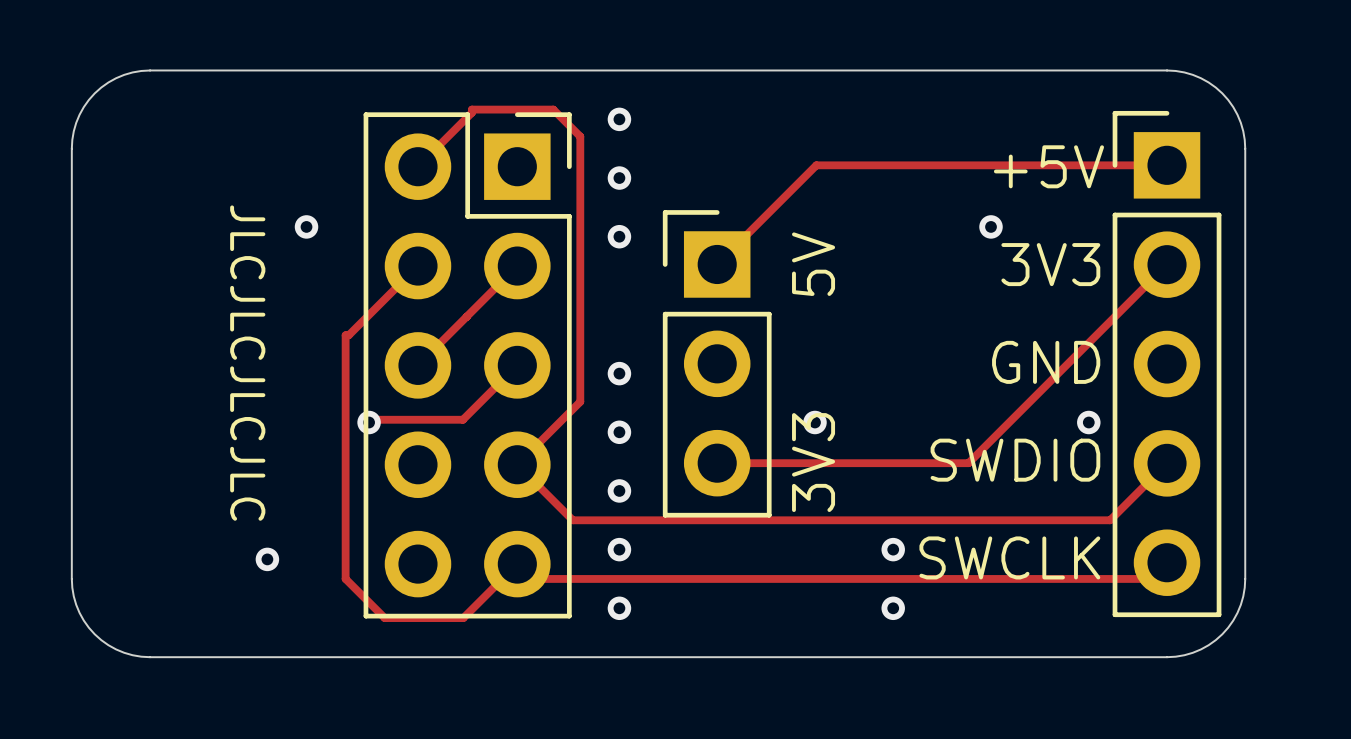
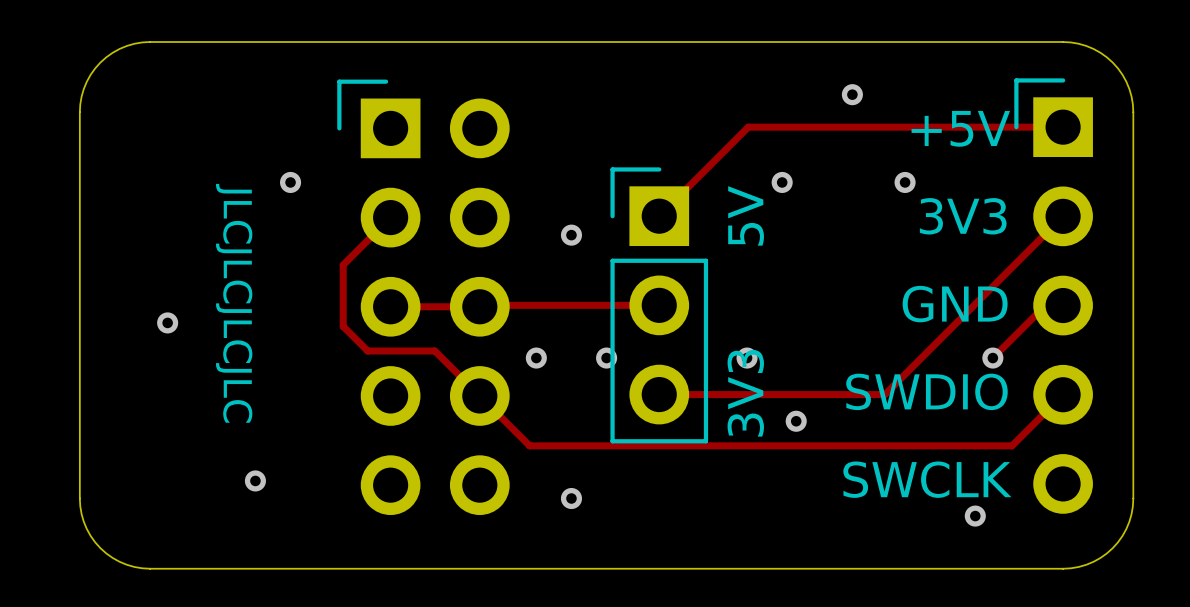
part footprint: [1112, 110, 1222, 618] -> [1014, 78, 1093, 514]
part footprint: [363, 112, 572, 619] -> [337, 79, 510, 516]
via: (619, 119) -> none
via: none -> (852, 94)
track: (417, 166) (471, 112) (471, 109) (553, 109) (580, 136) (580, 401) (517, 464) -> none
via: (619, 178) -> none
via: none -> (782, 182)
via: (619, 236) -> none
track: (517, 266) (466, 316) -> none
via: none -> (571, 235)
track: (466, 316) (417, 365) -> (659, 305) (390, 306)
track: (365, 318) (348, 335) (345, 335) (345, 578) (384, 618) (463, 618) (517, 564) -> (343, 264) (343, 326) (367, 351) (434, 351) (479, 395)
track: none -> (1063, 305) (1045, 305) (992, 358)
track: (517, 365) (462, 419) (371, 419) (369, 422) -> none
via: (619, 373) -> none
via: none -> (167, 322)
via: (369, 422) -> none
via: none -> (536, 358)
via: none -> (606, 358)
via: (619, 432) -> none
via: (619, 490) -> none
via: none -> (796, 421)
via: (619, 549) -> none
via: (893, 549) -> none
track: (532, 578) (1150, 578) -> none
via: none -> (571, 498)
via: none -> (975, 516)
via: (619, 608) -> none
via: (893, 608) -> none

